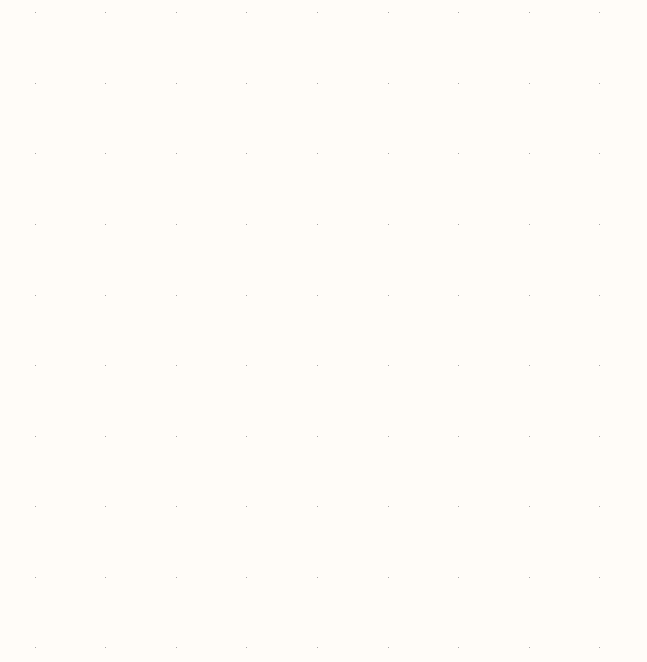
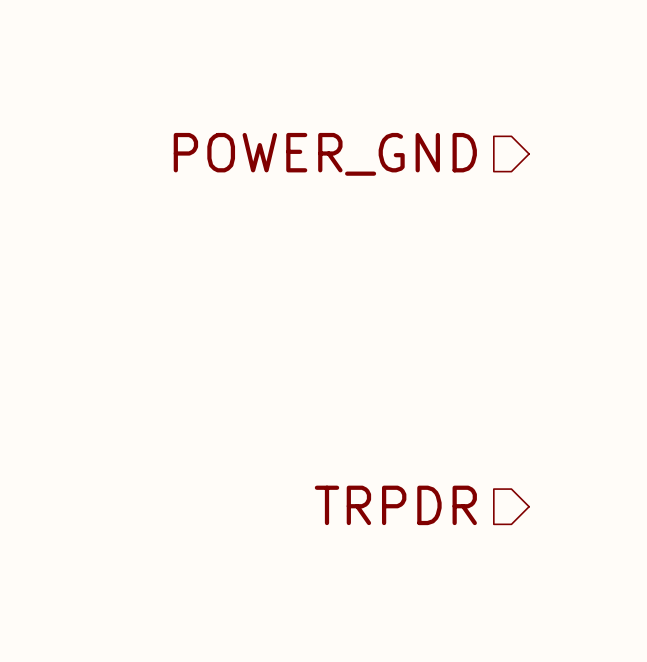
hierarchical label: none -> POWER_GND (325, 154)
hierarchical label: none -> TRPDR (395, 505)

